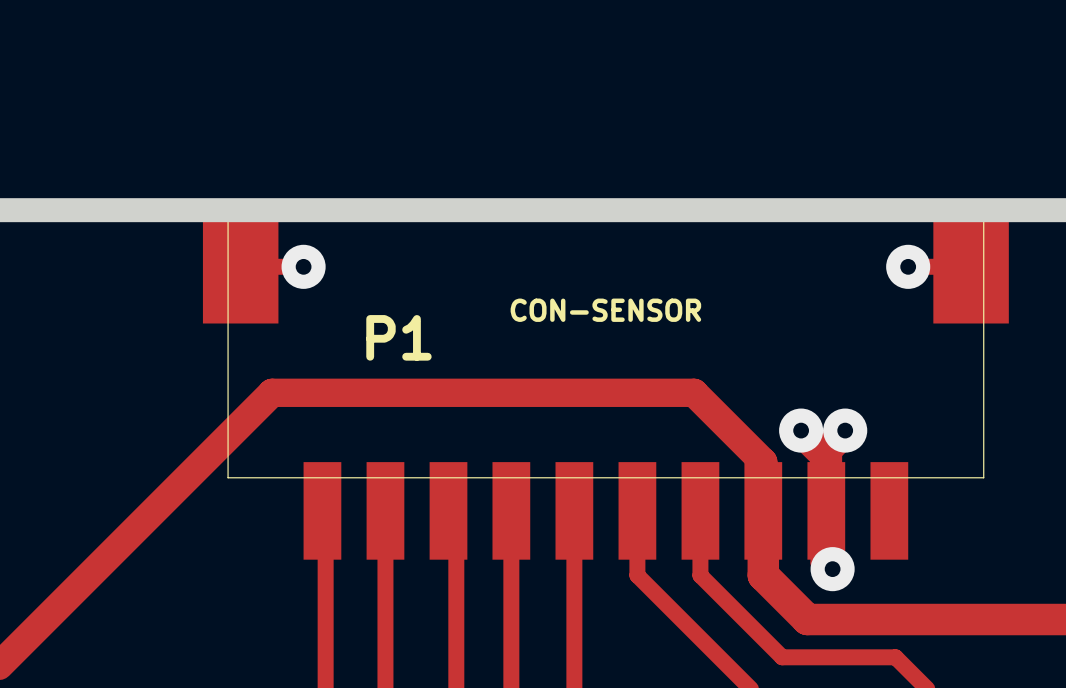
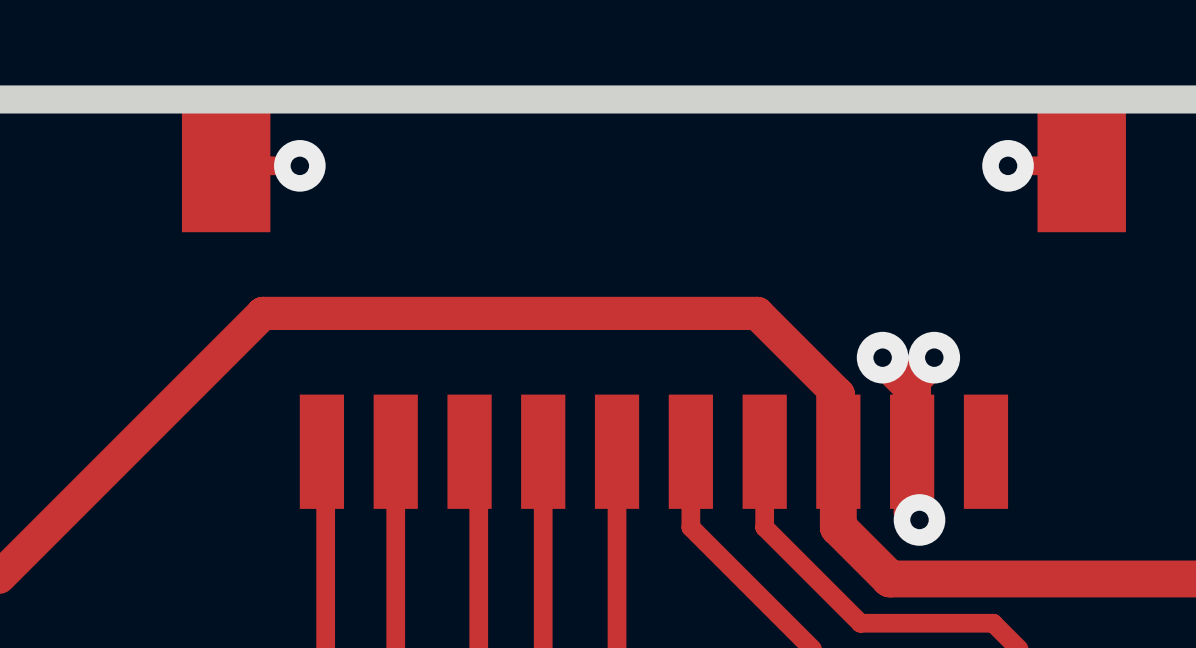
P1: CON-SENSOR (605, 384) -> none
part: none -> (653, 304)

